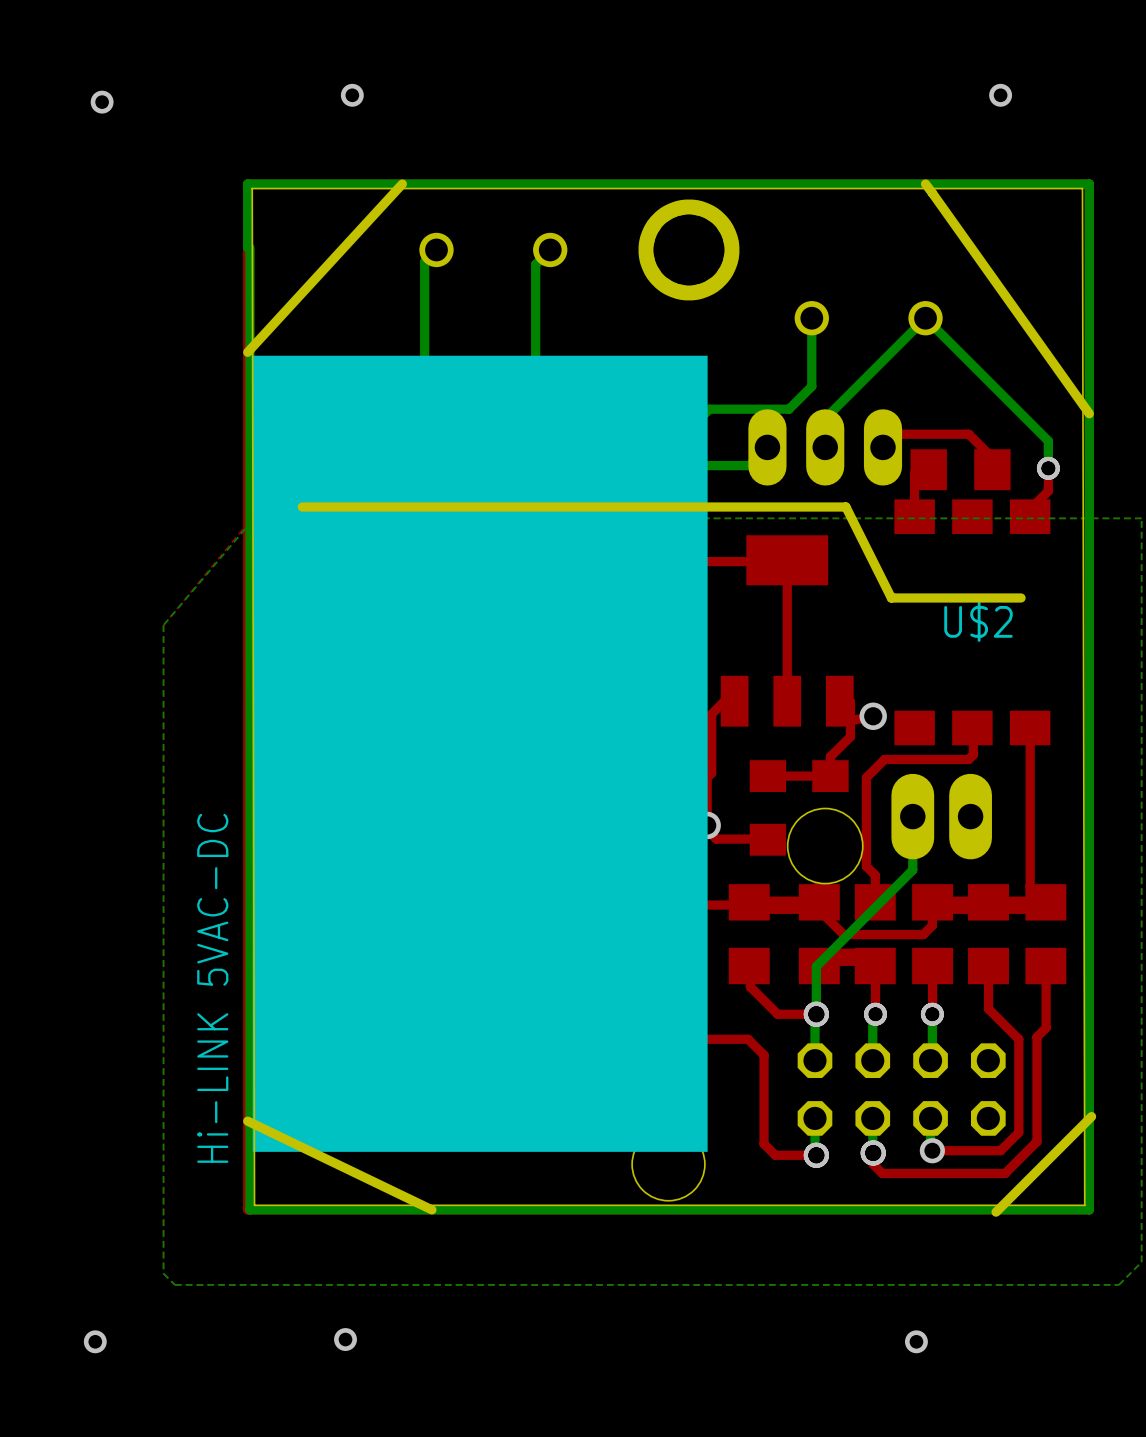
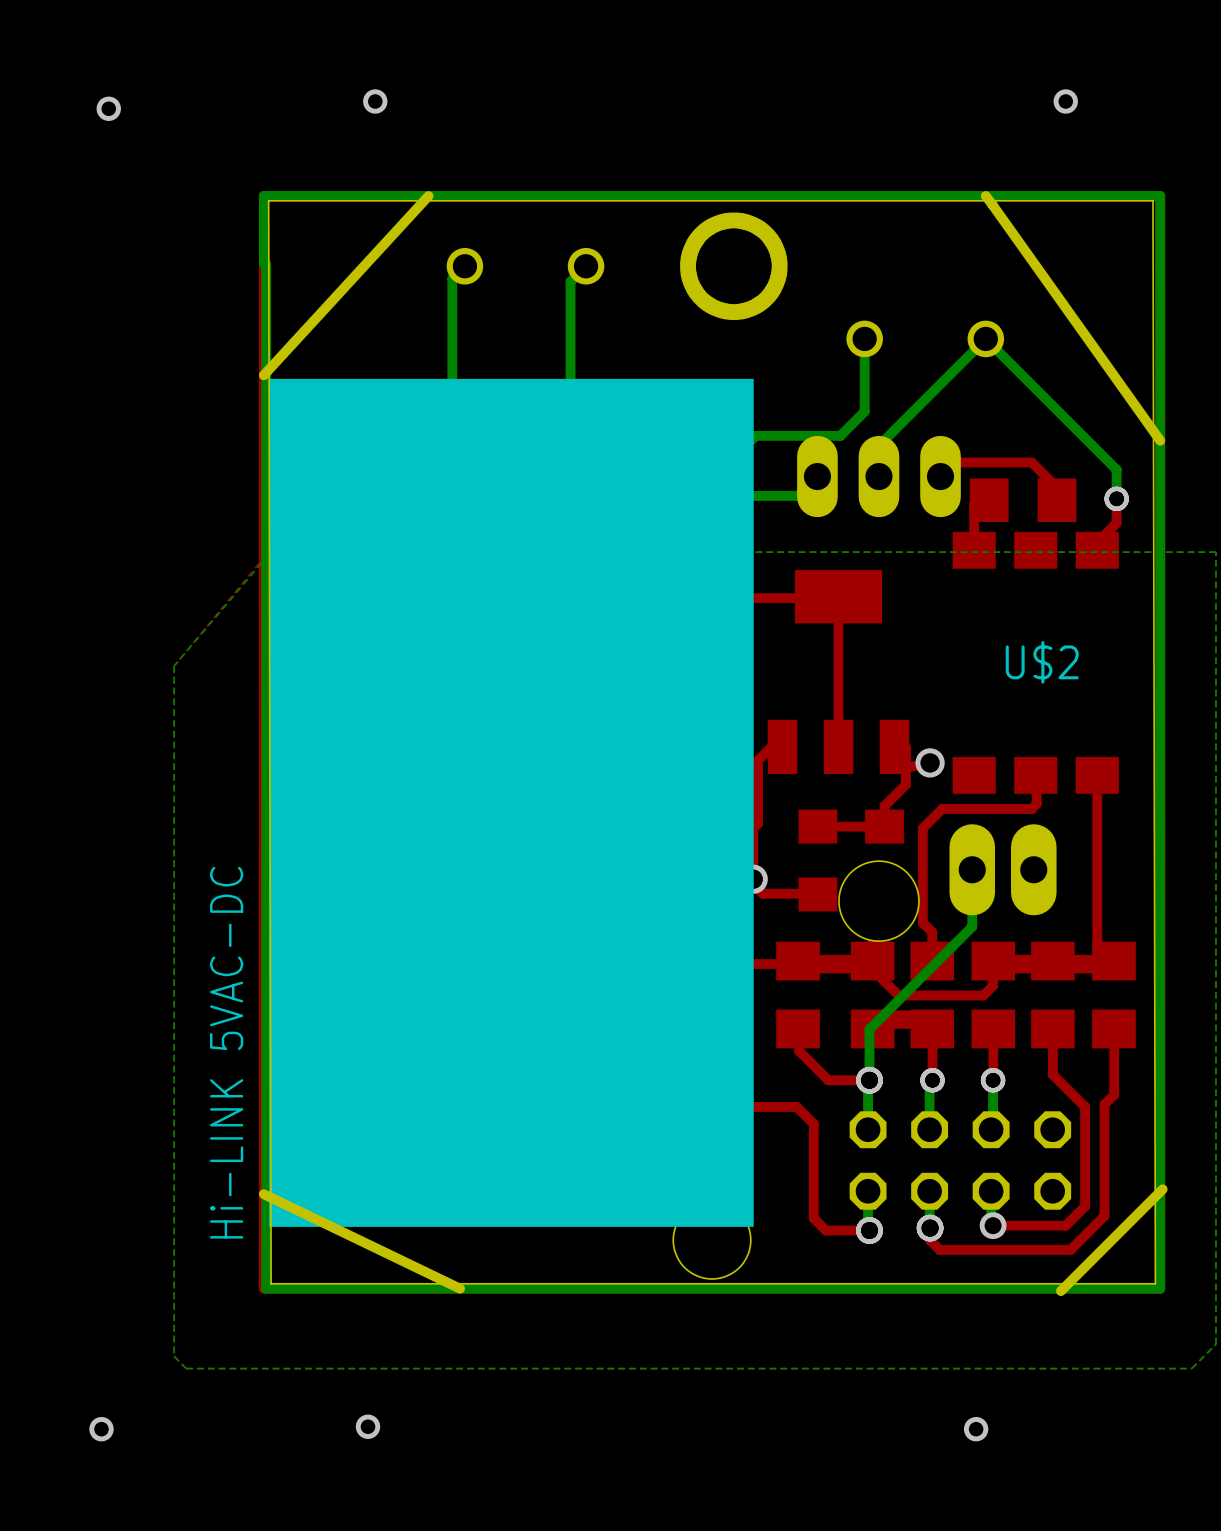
board edge: (302, 507) (845, 507) (891, 597) (1021, 597) -> none

